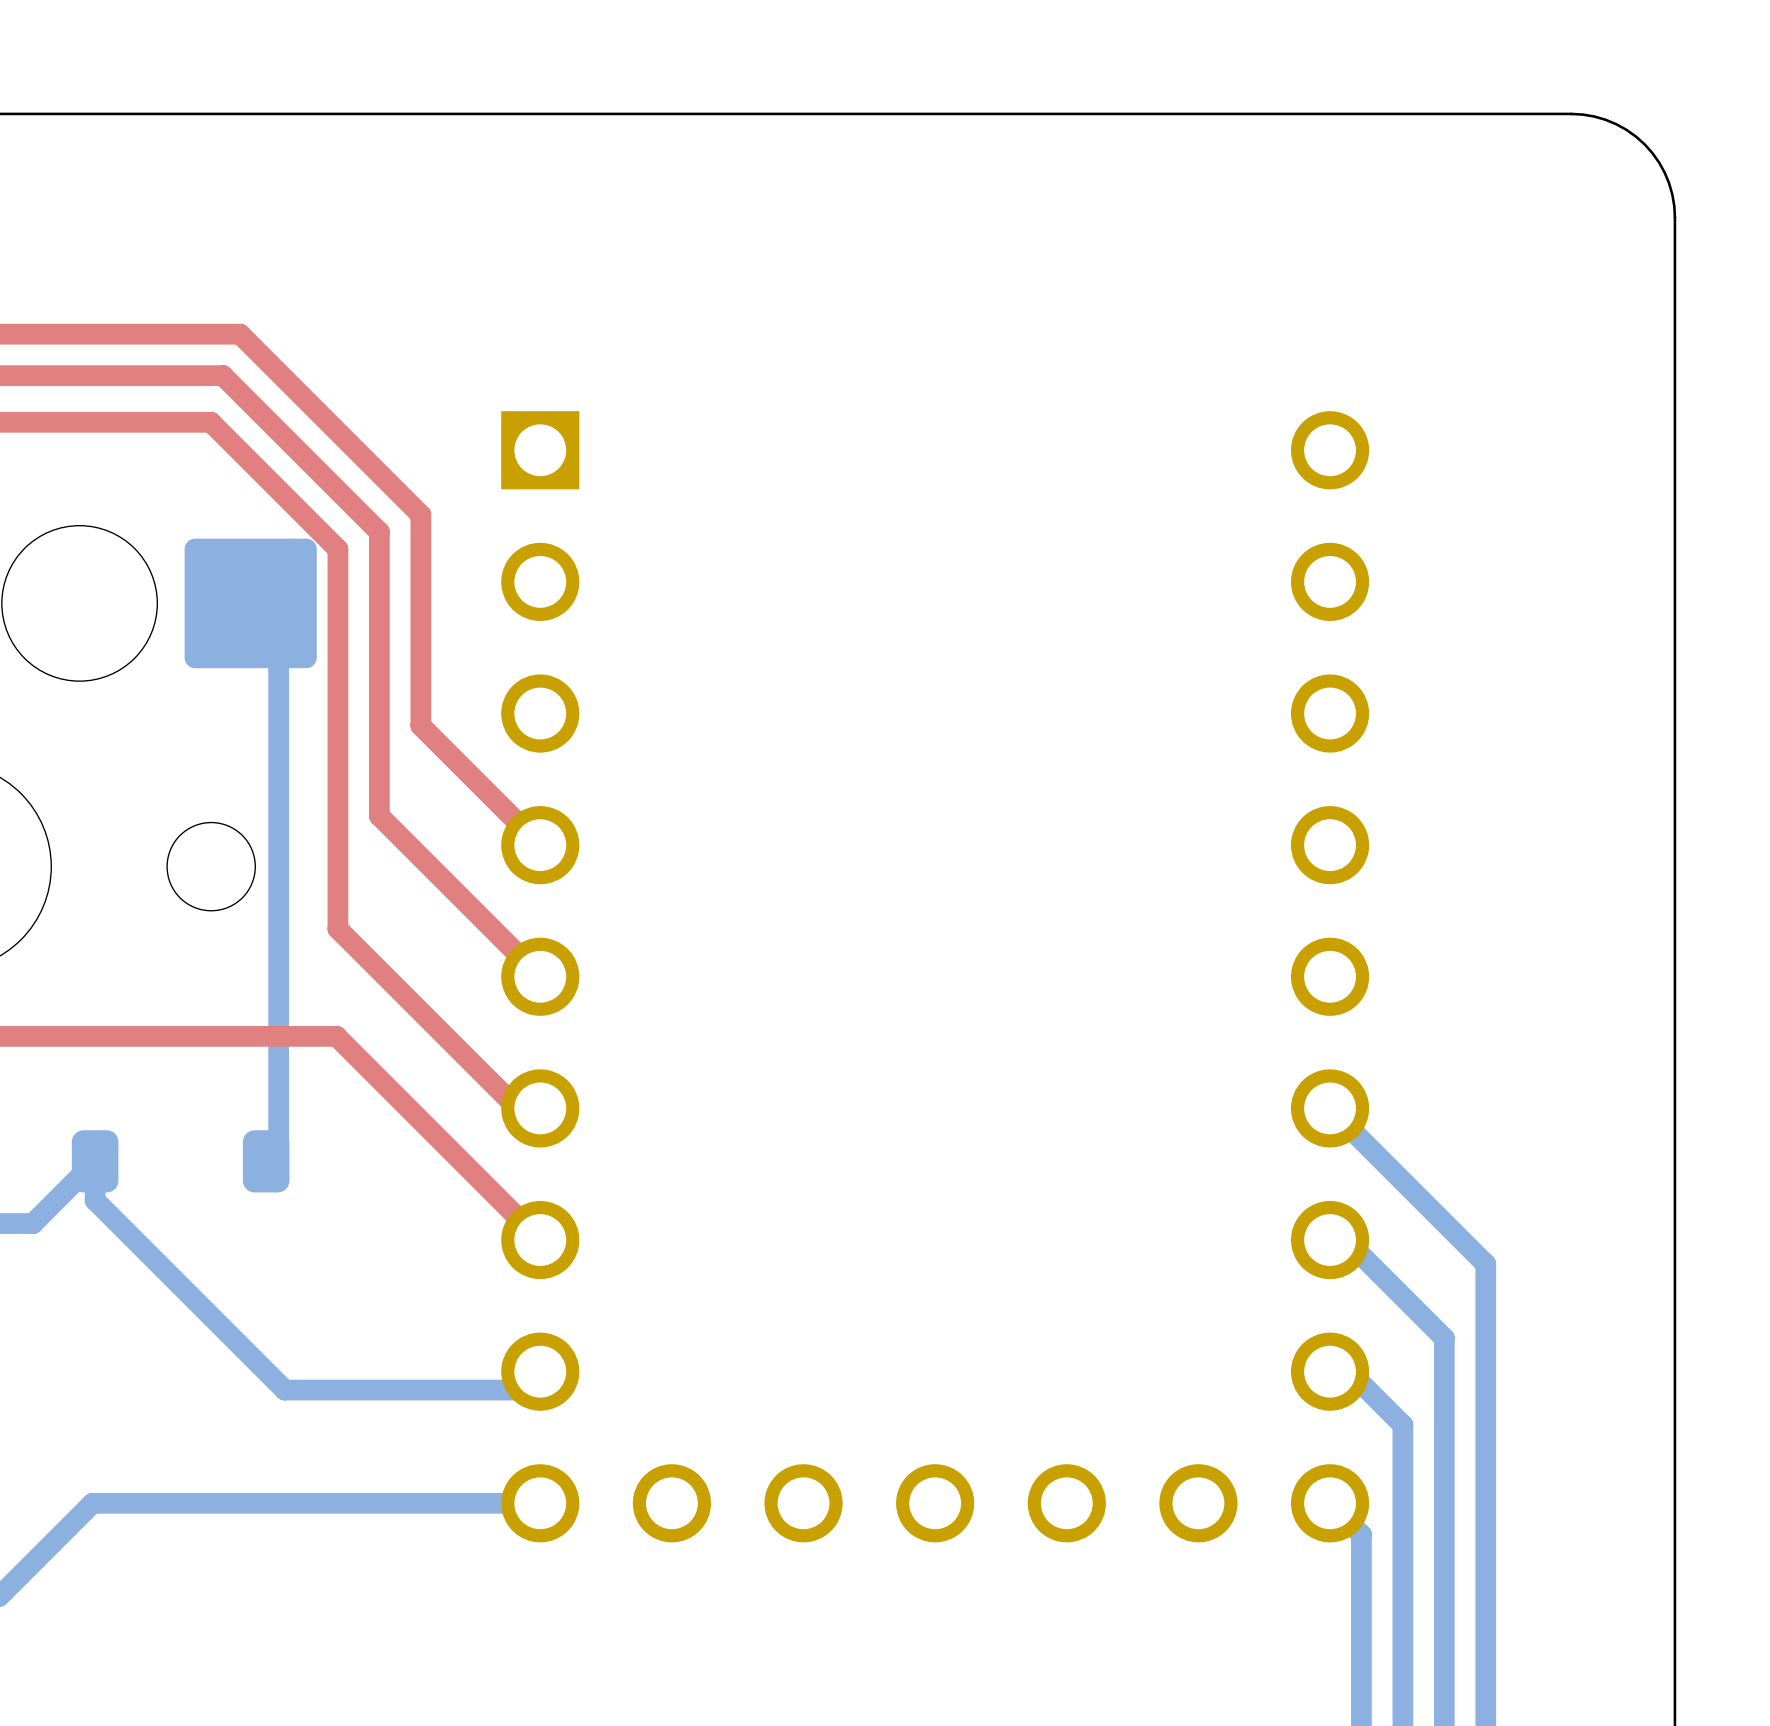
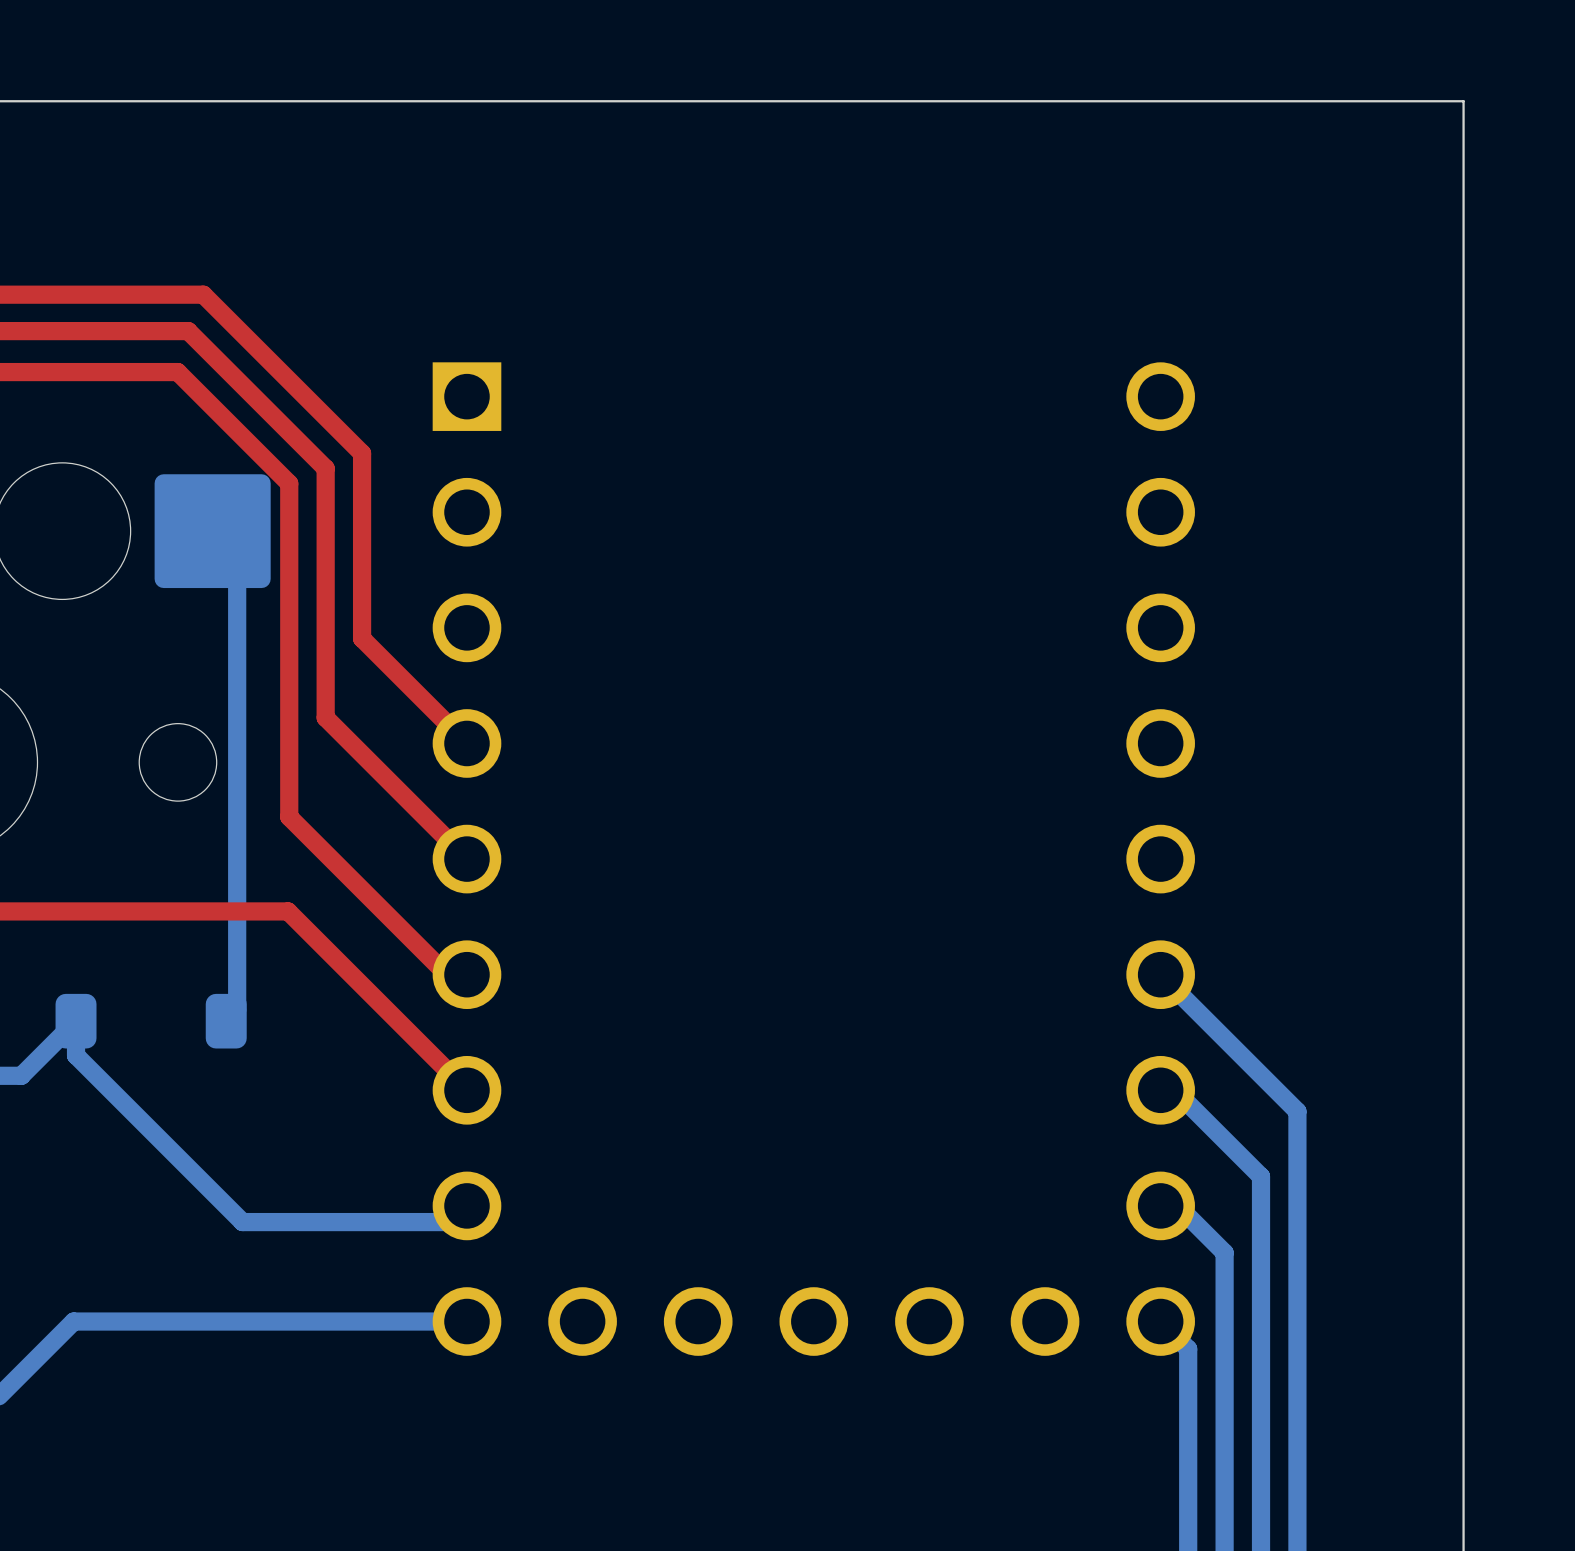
board edge: (1571, 113) (1605, 119) (1626, 129) (1644, 144) (1664, 172) (1672, 194) (1674, 217) -> (1372, 101) (1463, 101) (1463, 192)

